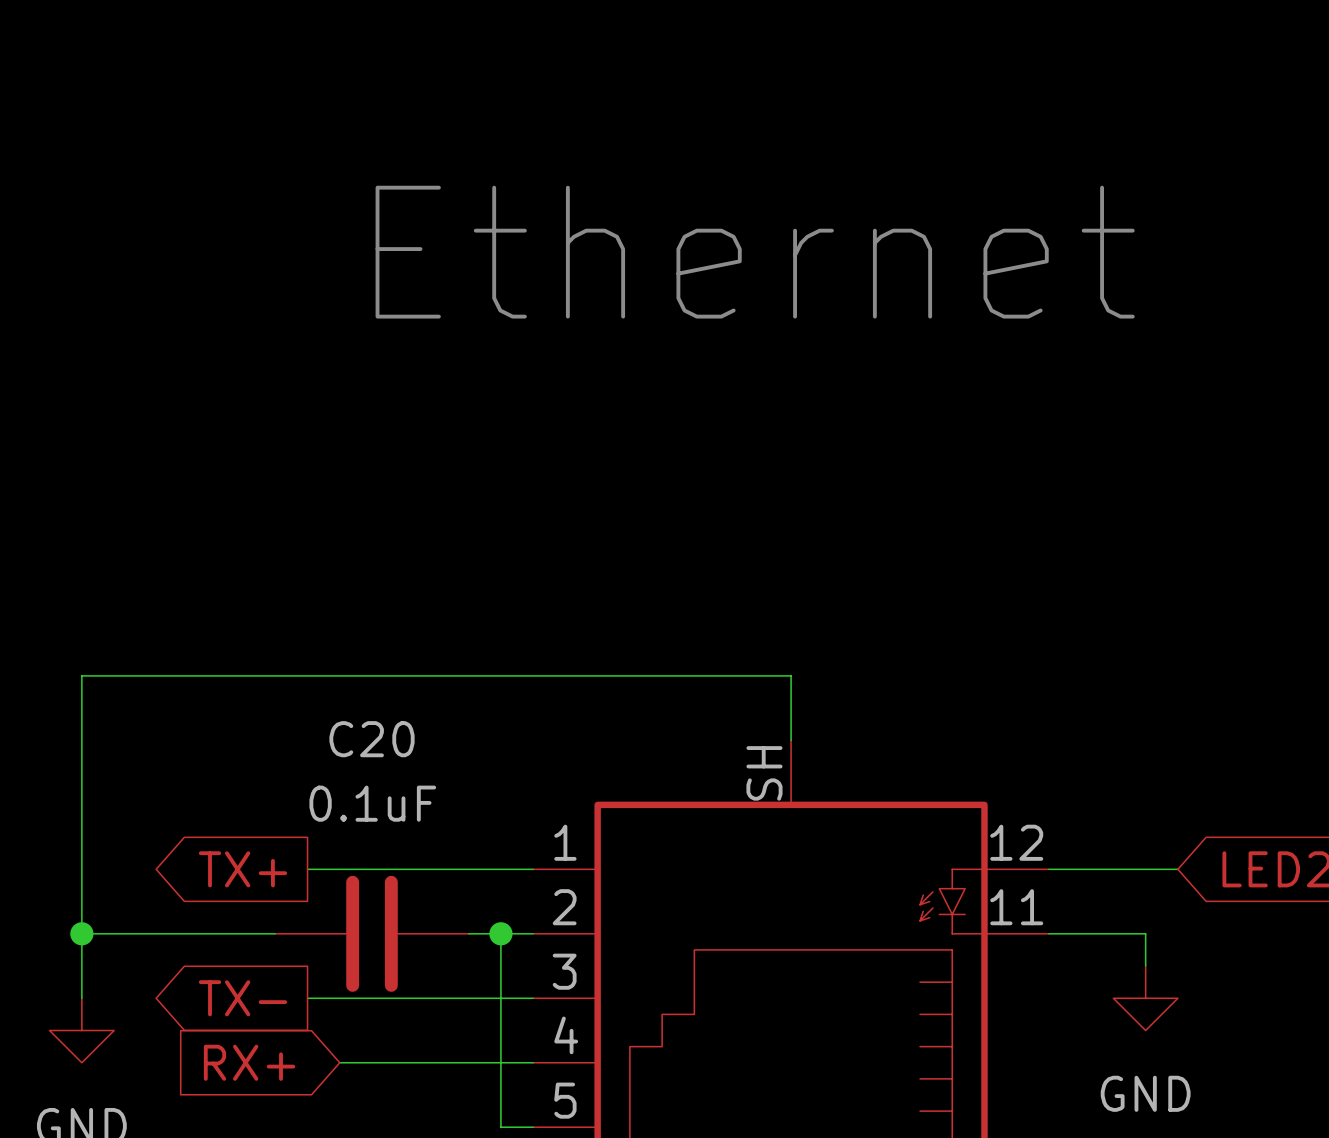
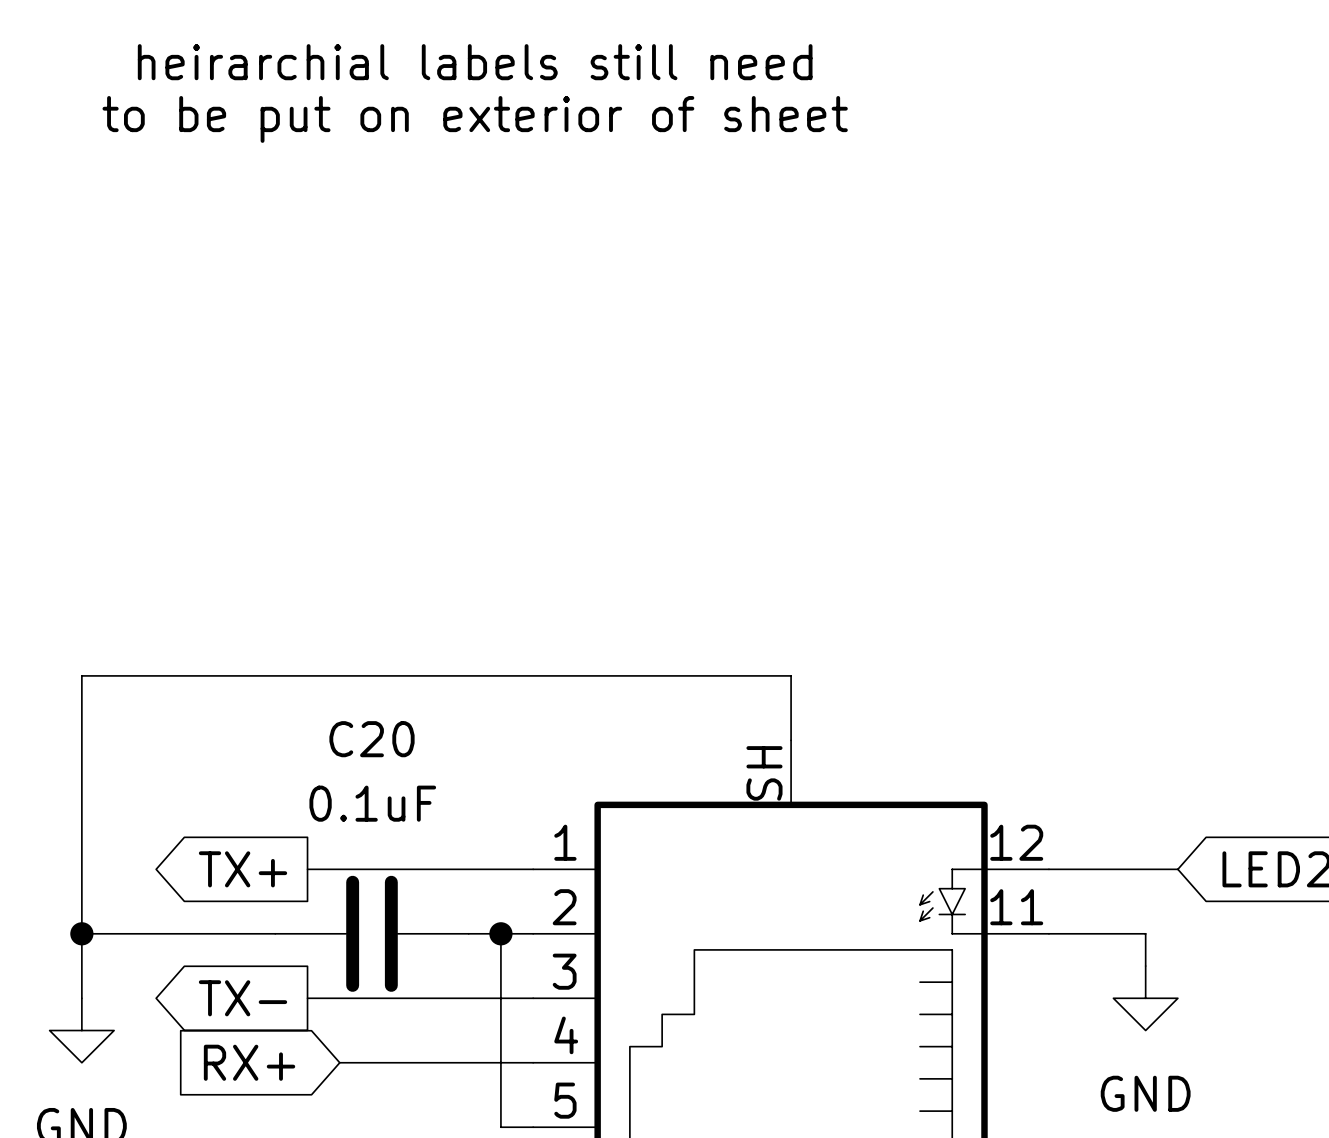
text: none -> heirarchial labels still need (475, 62)
text: none -> to be put on exterior of sheet (475, 119)
text: Ethernet (755, 252) -> none

